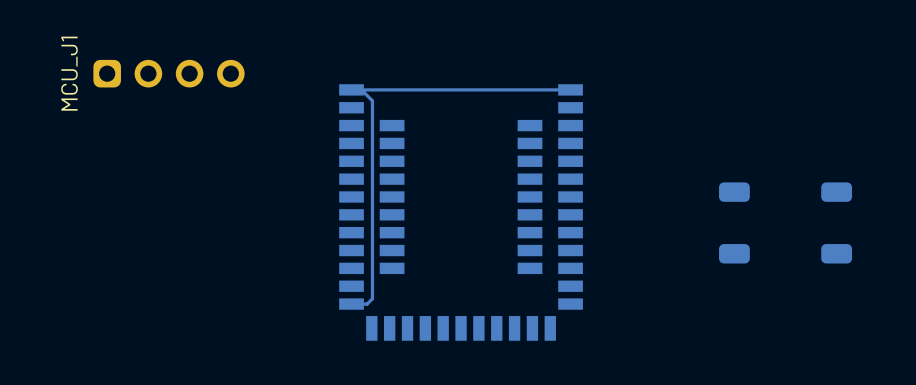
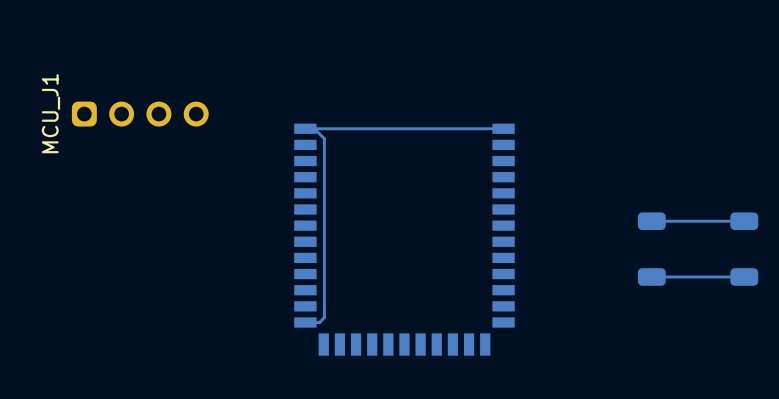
part footprint: [339, 84, 583, 341] -> [294, 123, 515, 356]
bottom track: none -> (651, 221) (744, 221)
bottom track: none -> (651, 276) (744, 276)

